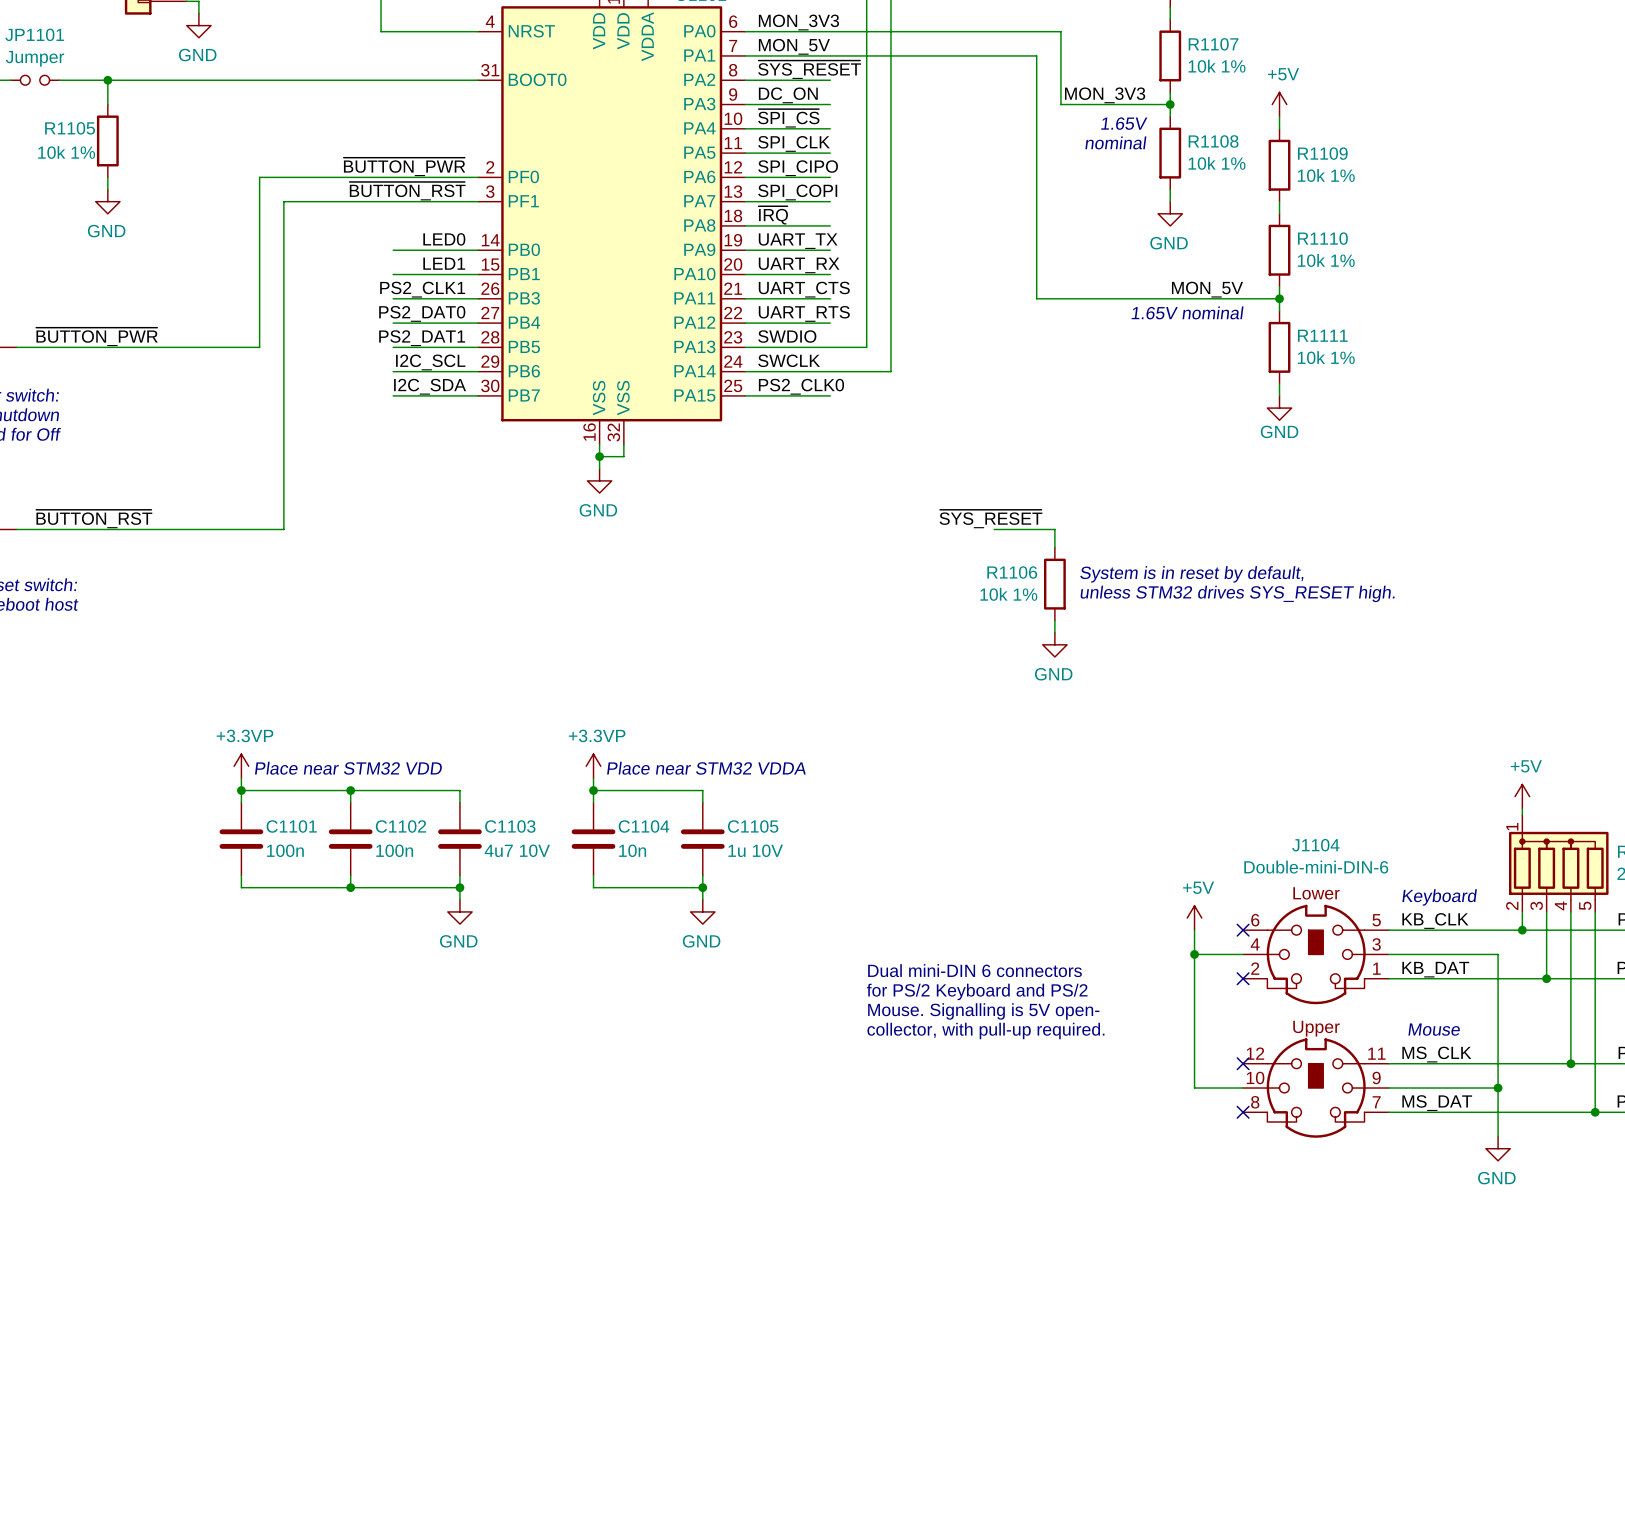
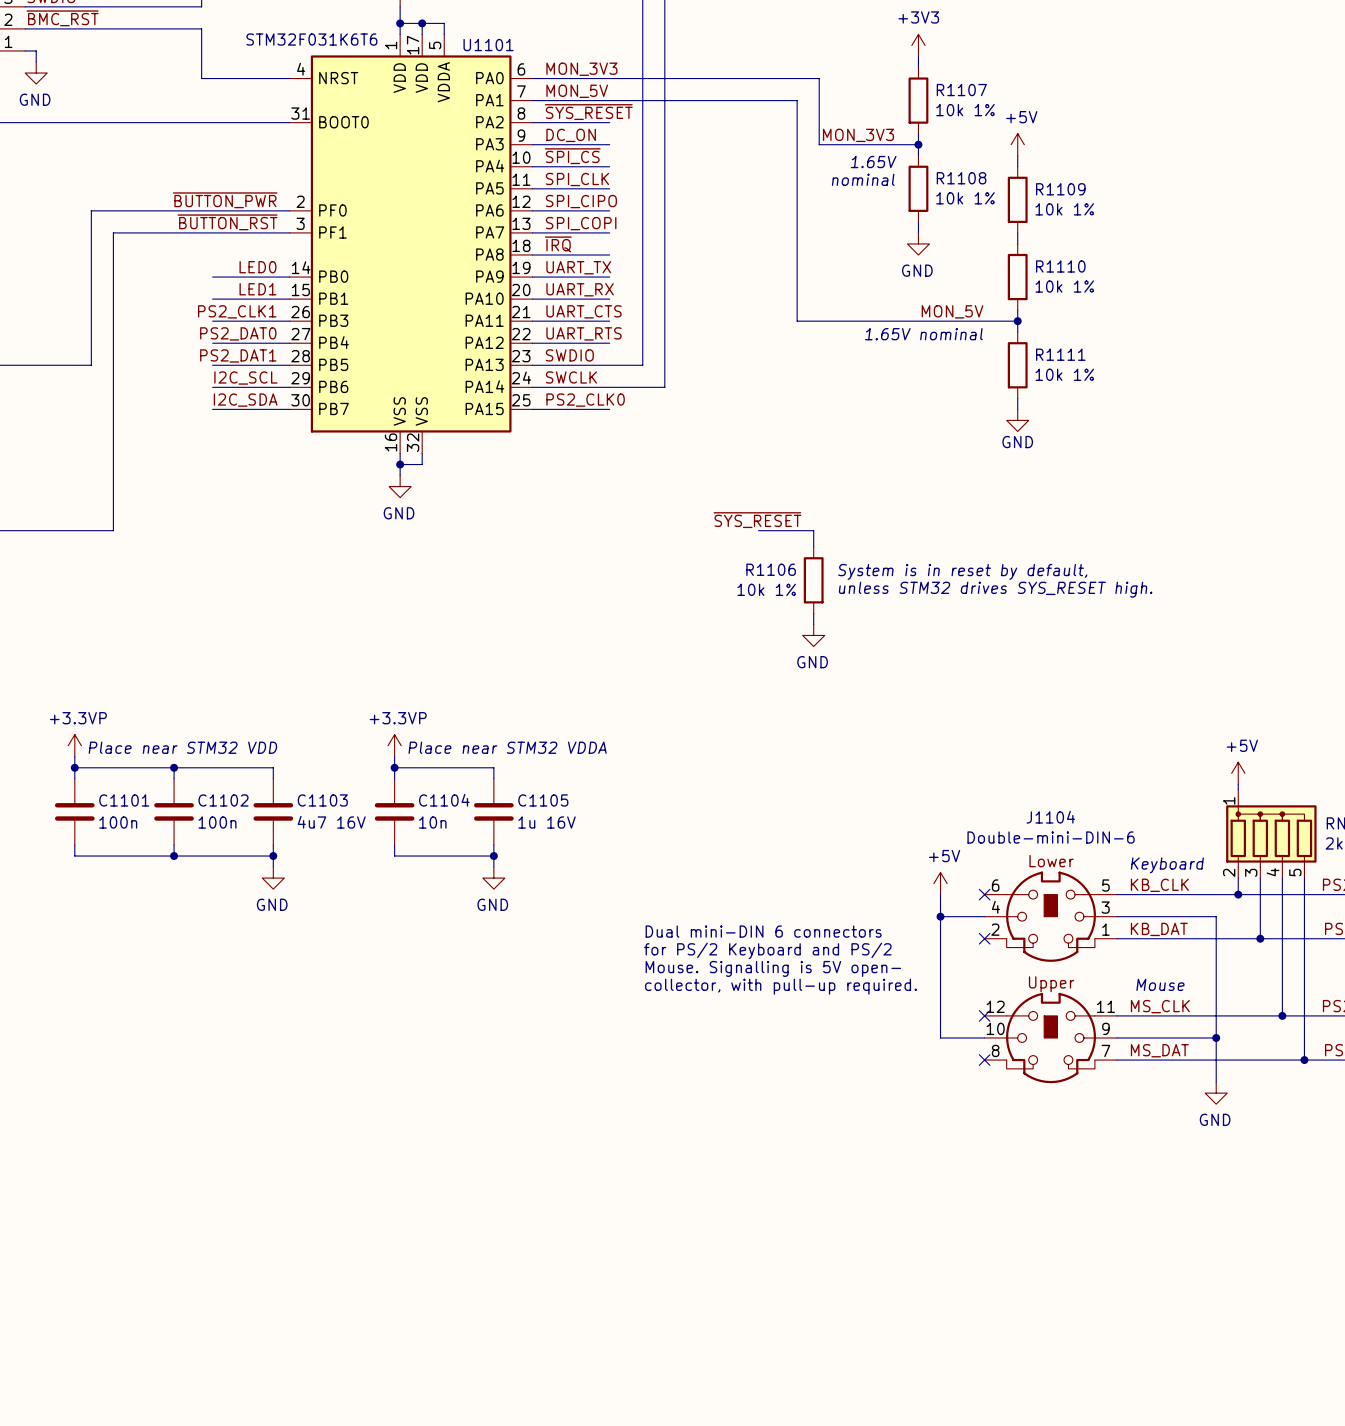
C1103 value: 4u7 10V (517, 850) -> 4u7 16V (331, 822)
C1105 value: 1u 10V (755, 850) -> 1u 16V (547, 822)

